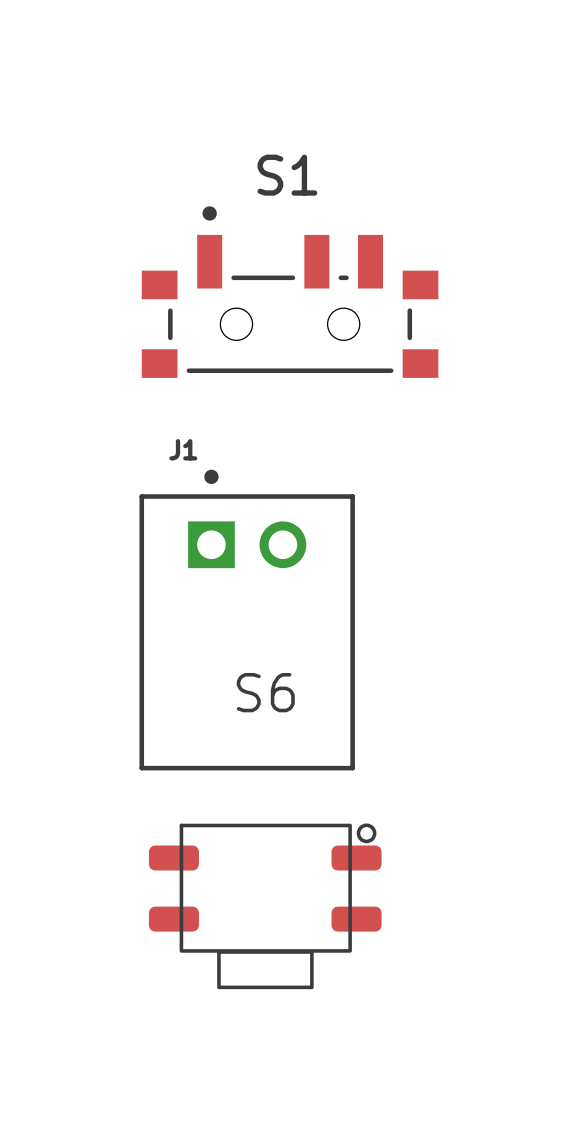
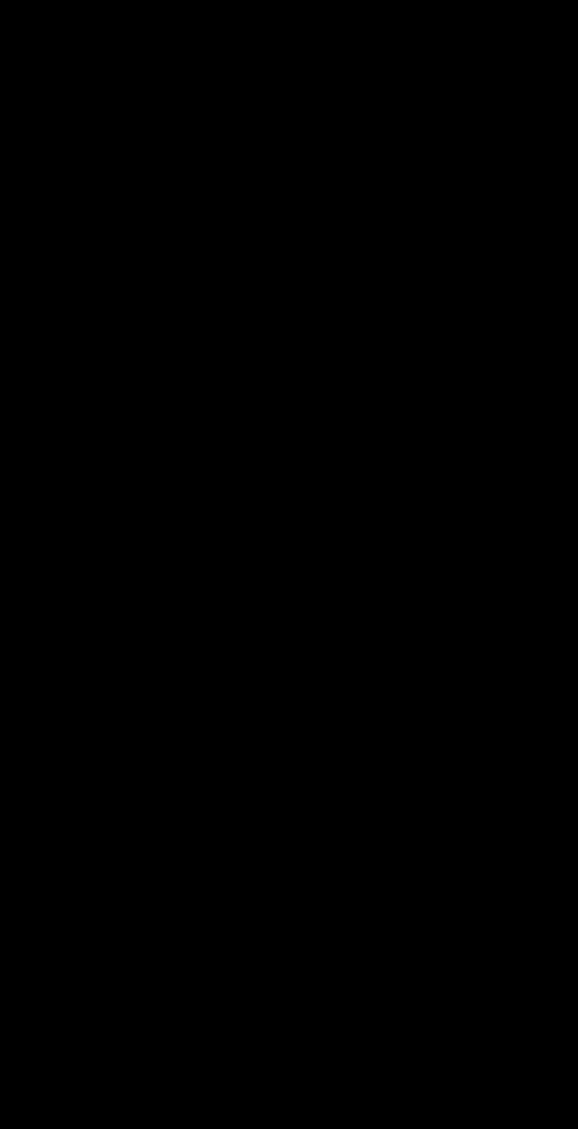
S1: (290, 292) -> none
J1: (247, 620) -> none
S6: (265, 906) -> none

